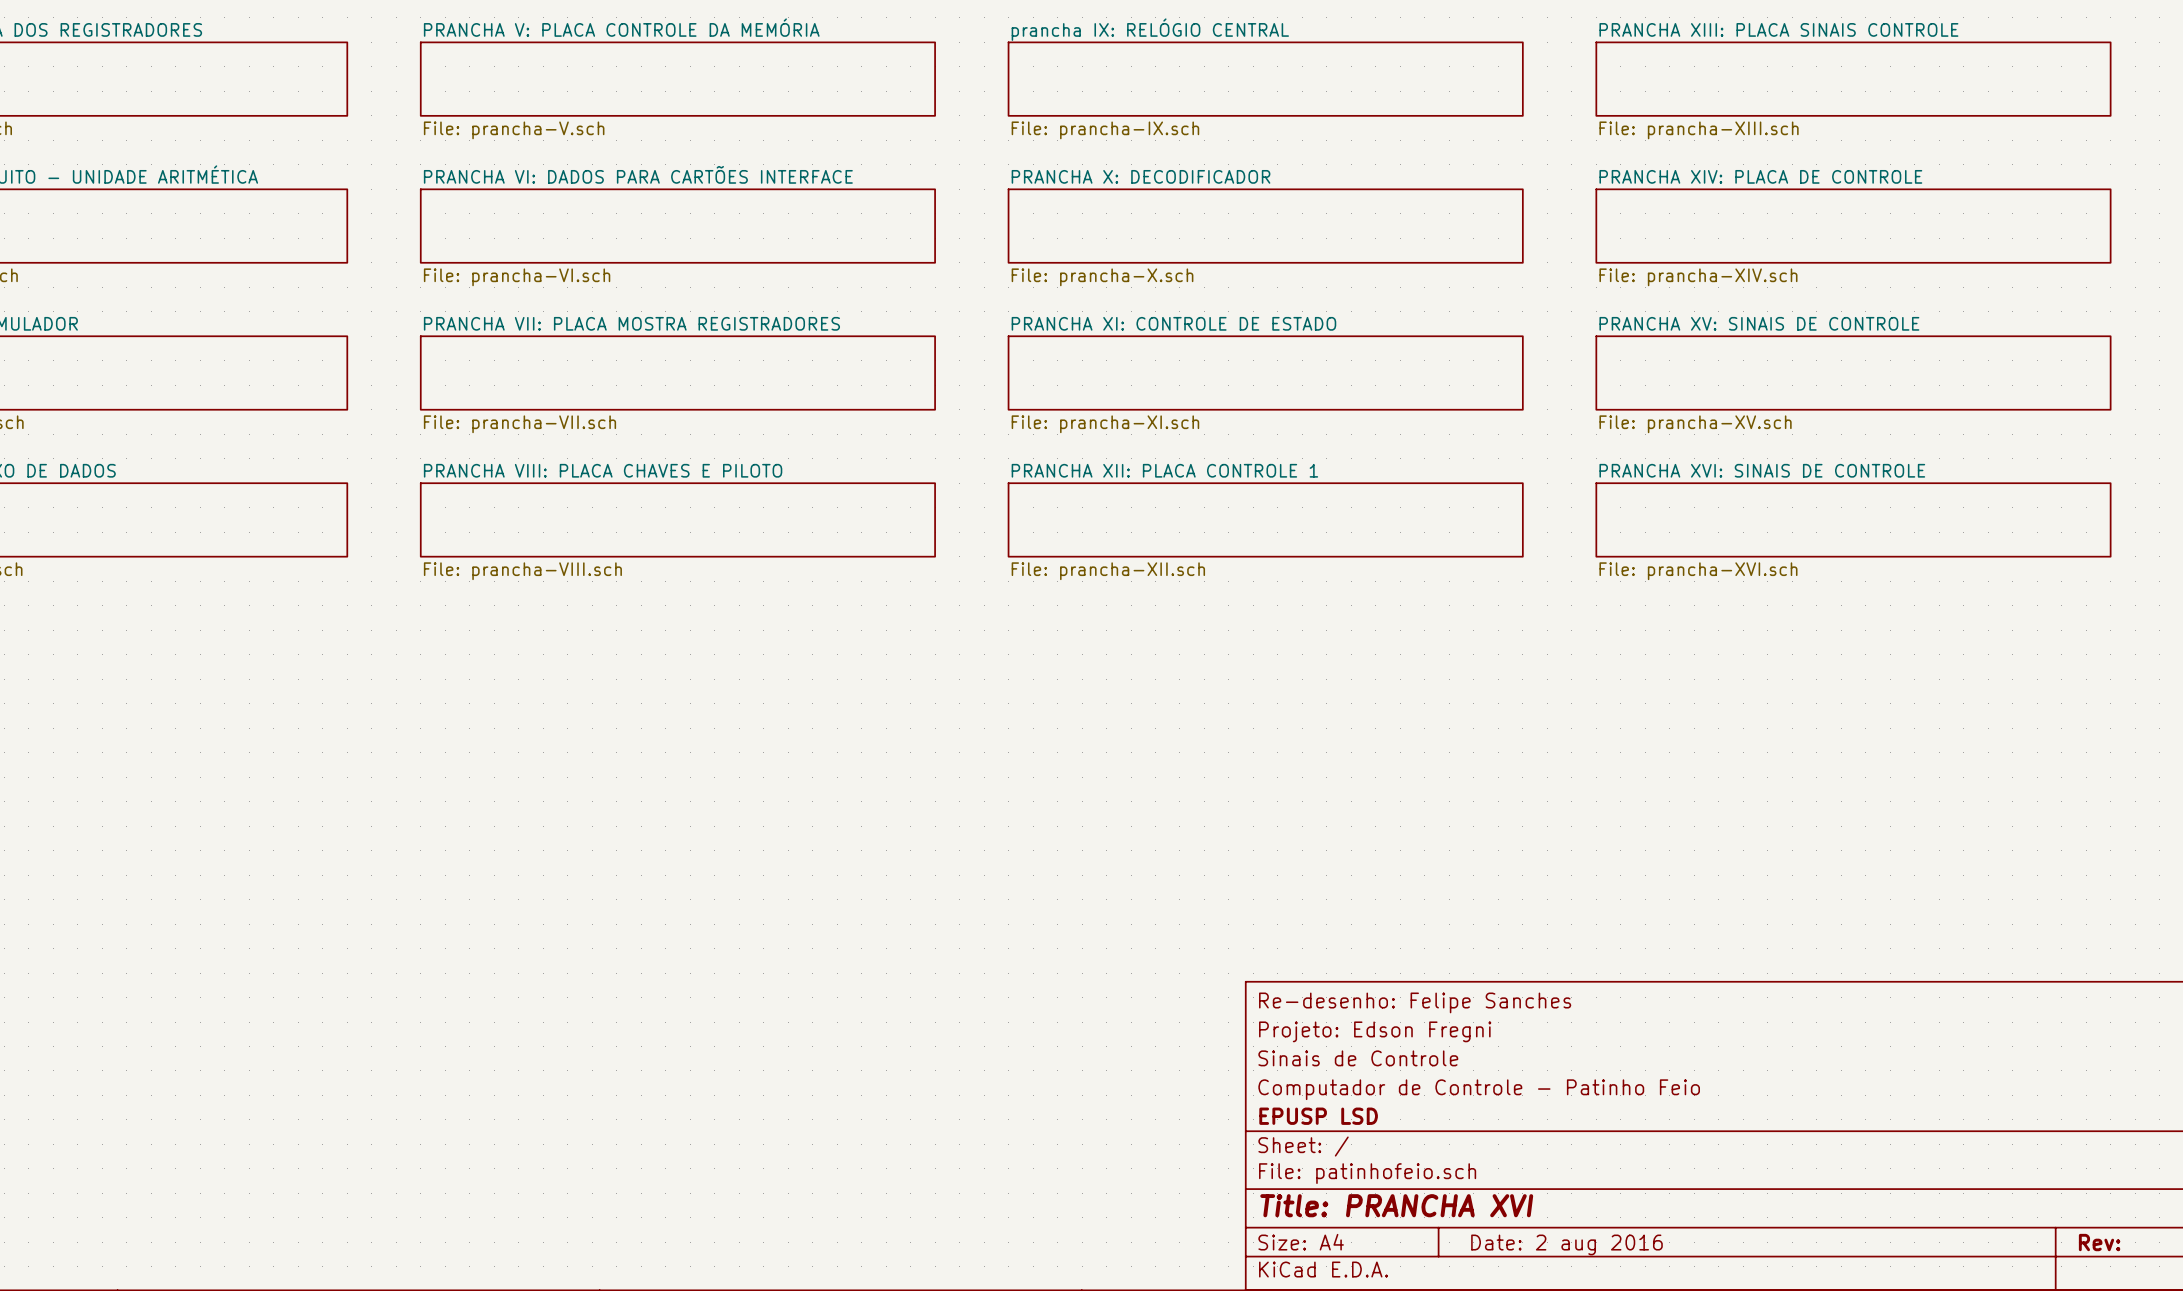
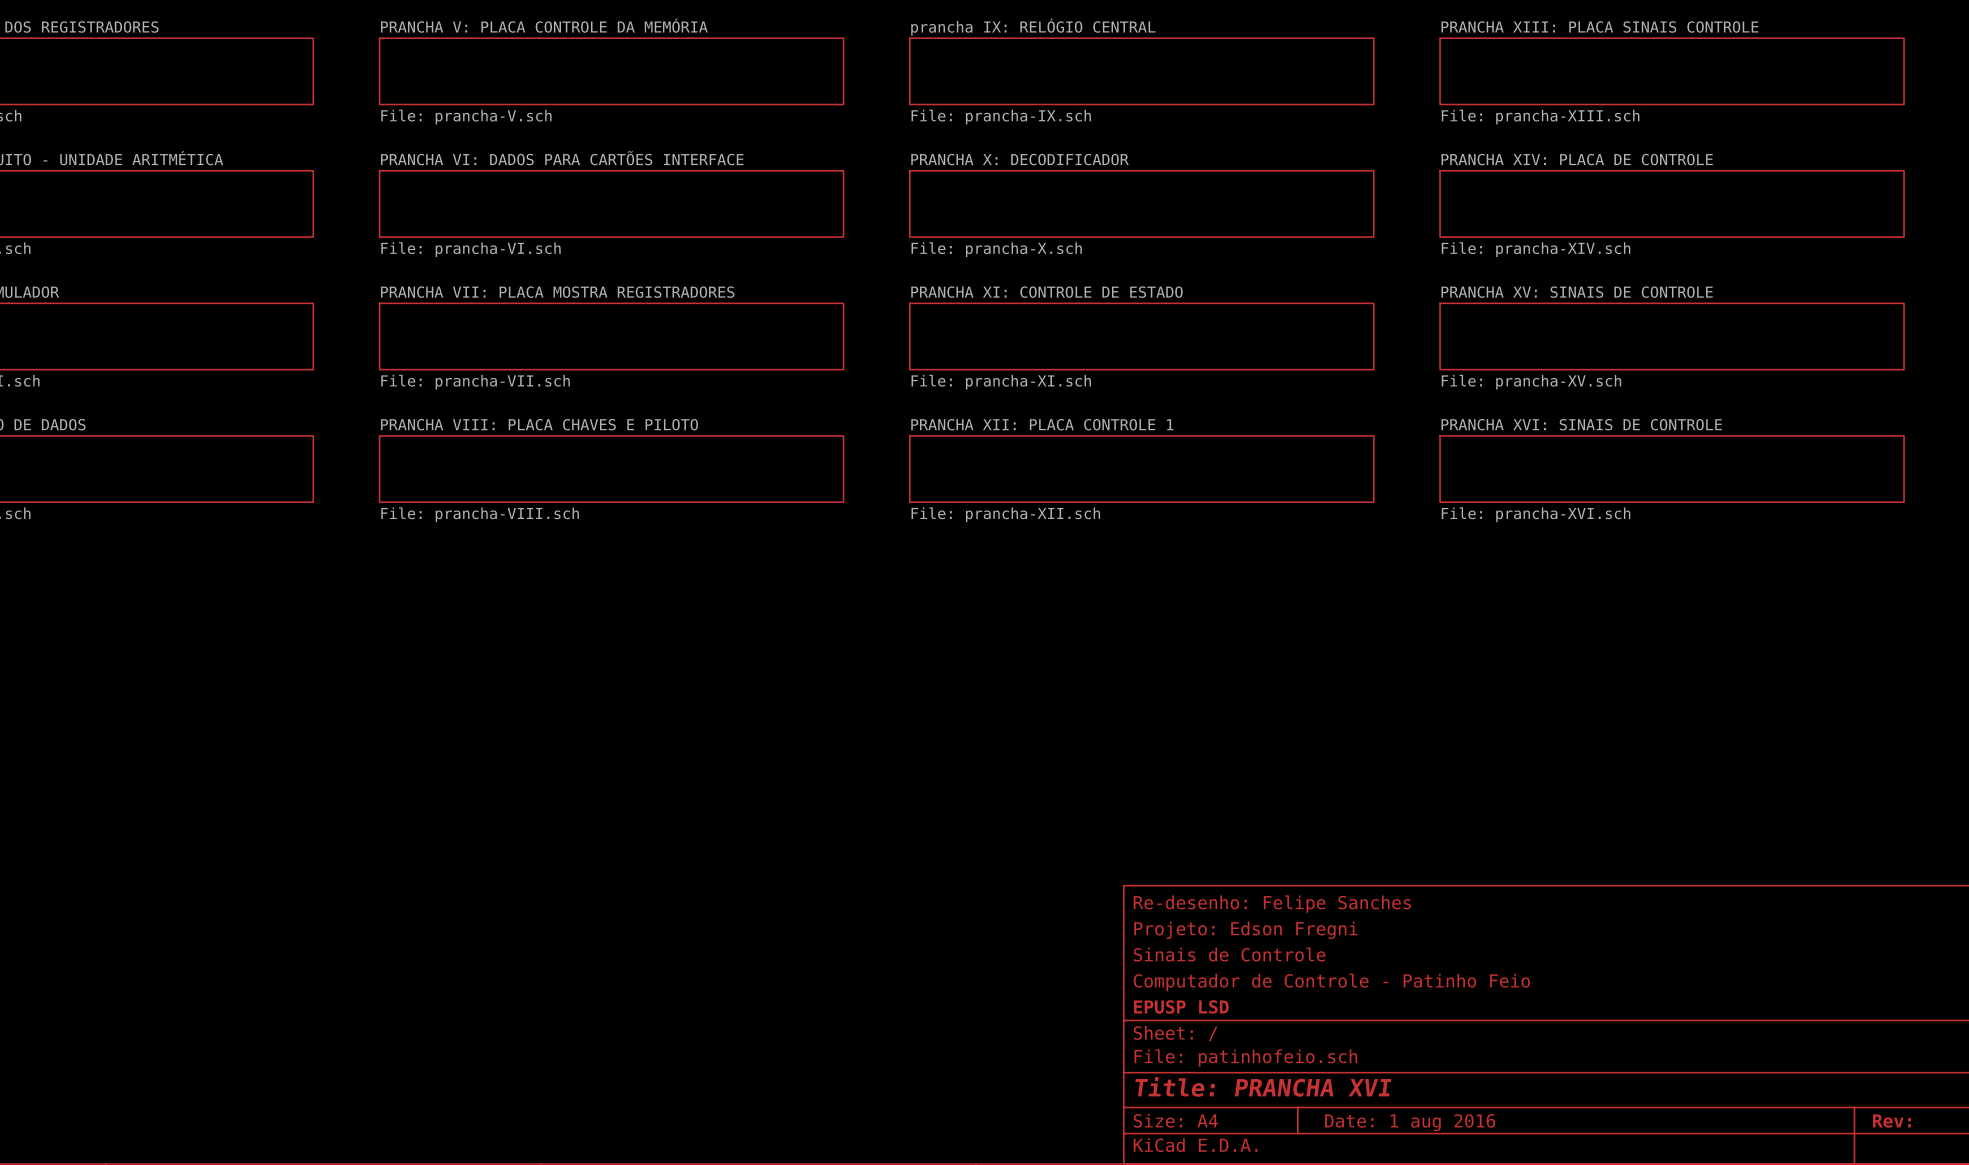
title block: Date: 2 aug 2016 (1566, 1244) -> Date: 1 aug 2016 (1410, 1122)

